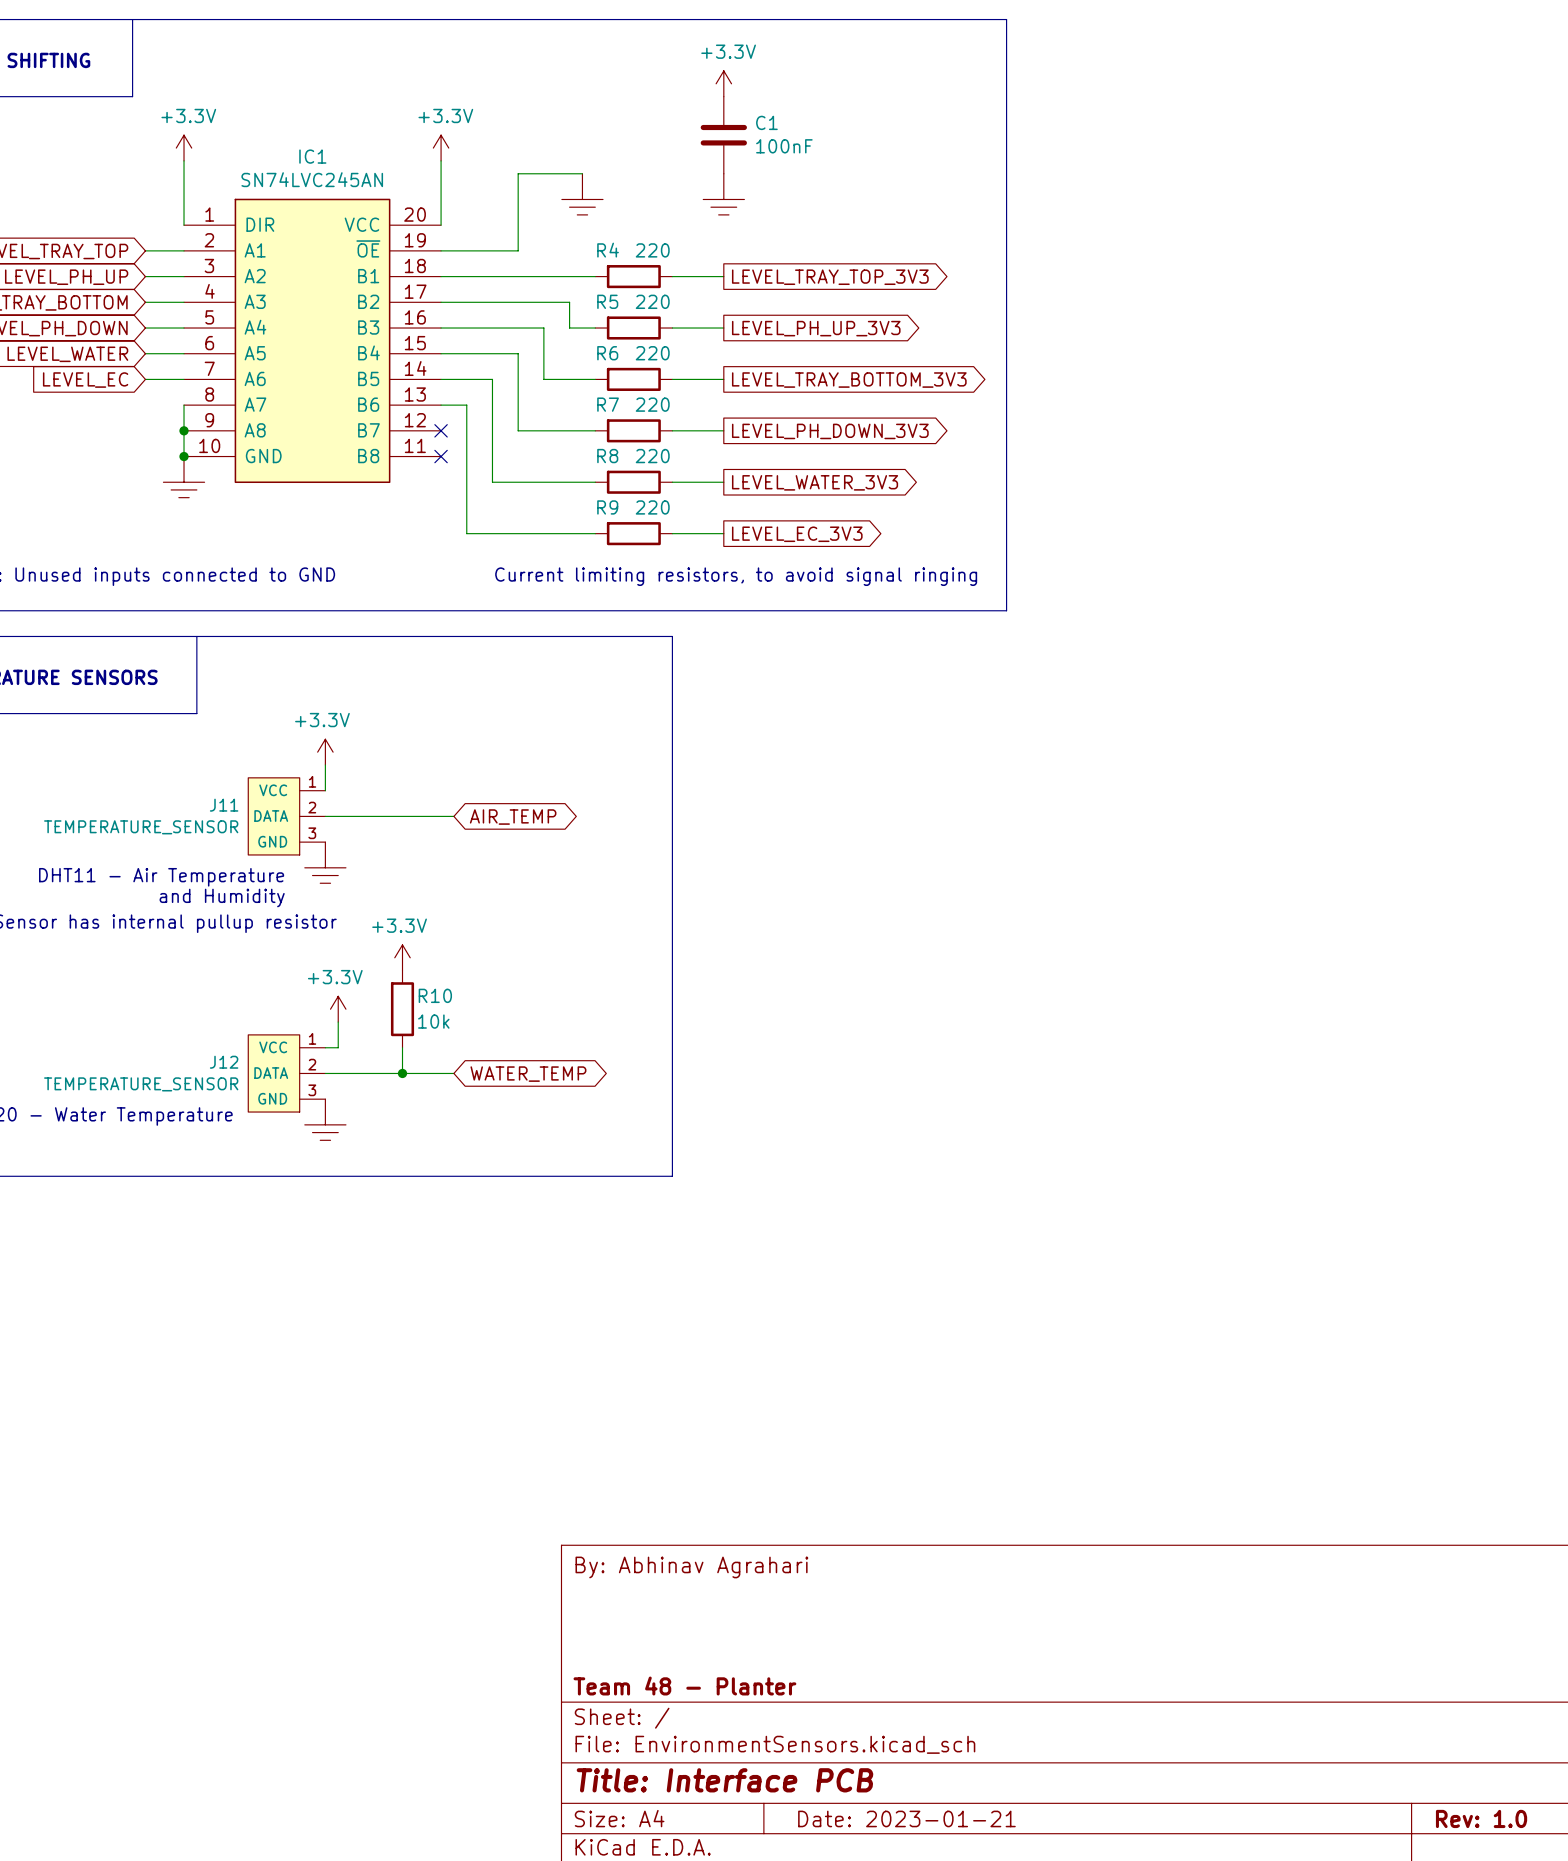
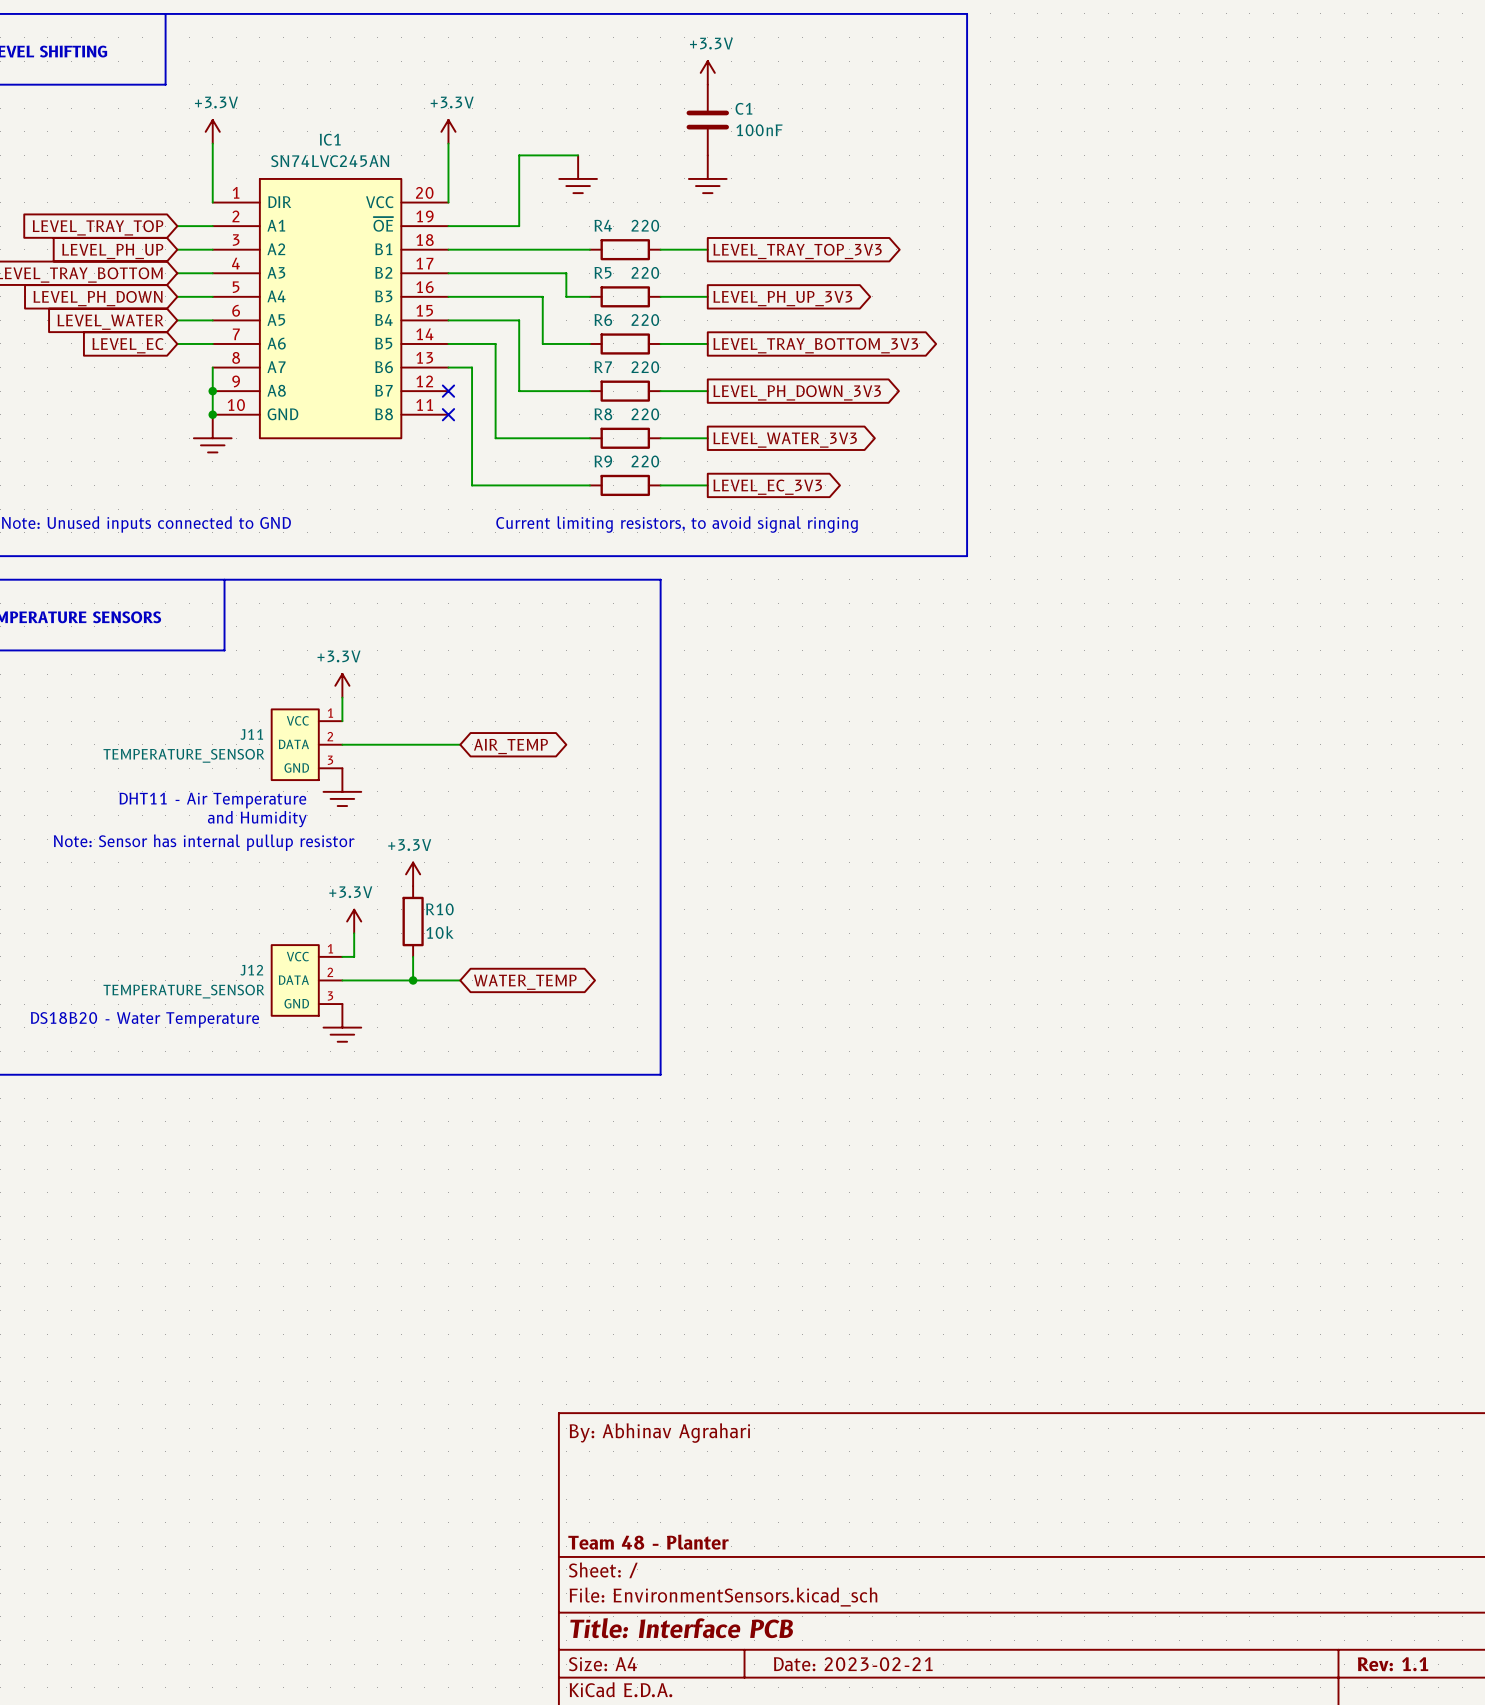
title block: Date: 2023-01-21 (906, 1818) -> Date: 2023-02-21 (853, 1664)
title block: Rev: 1.0 (1481, 1818) -> Rev: 1.1 (1393, 1664)

